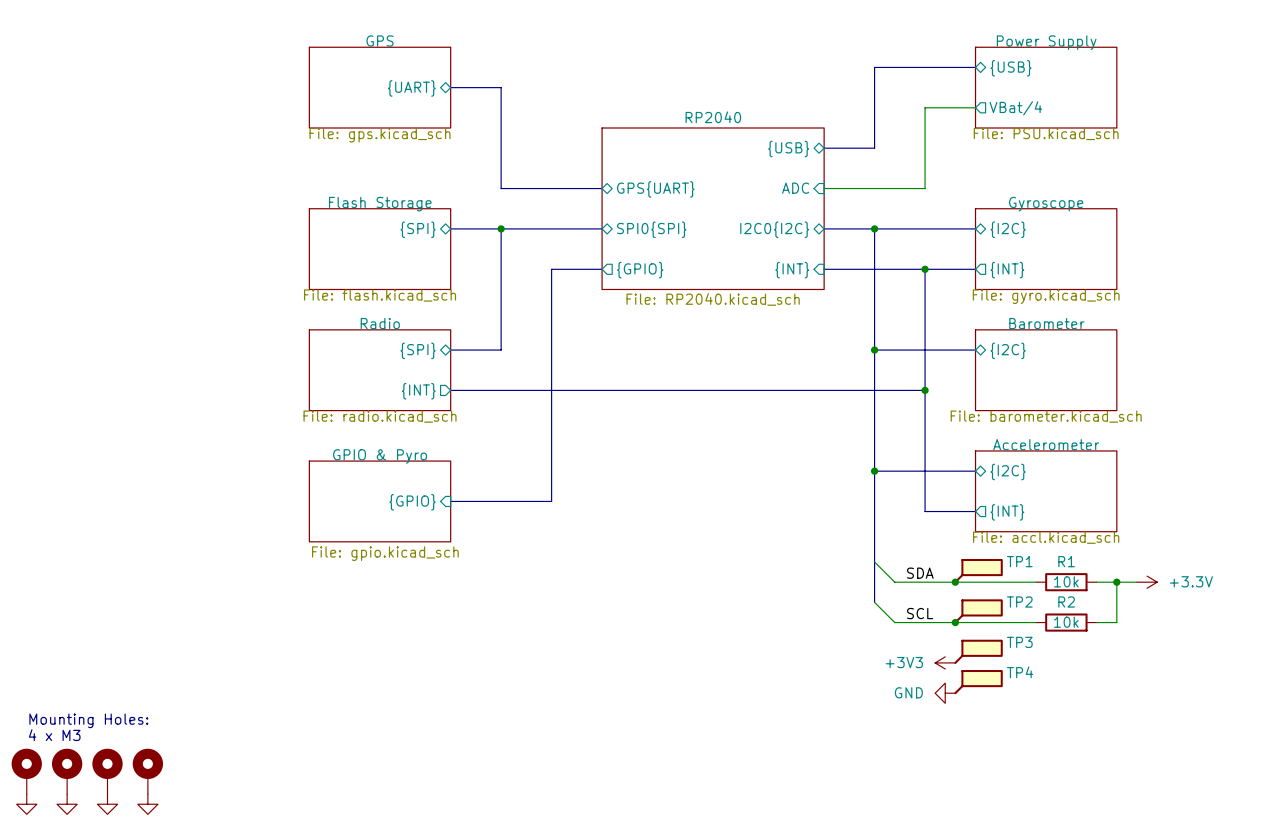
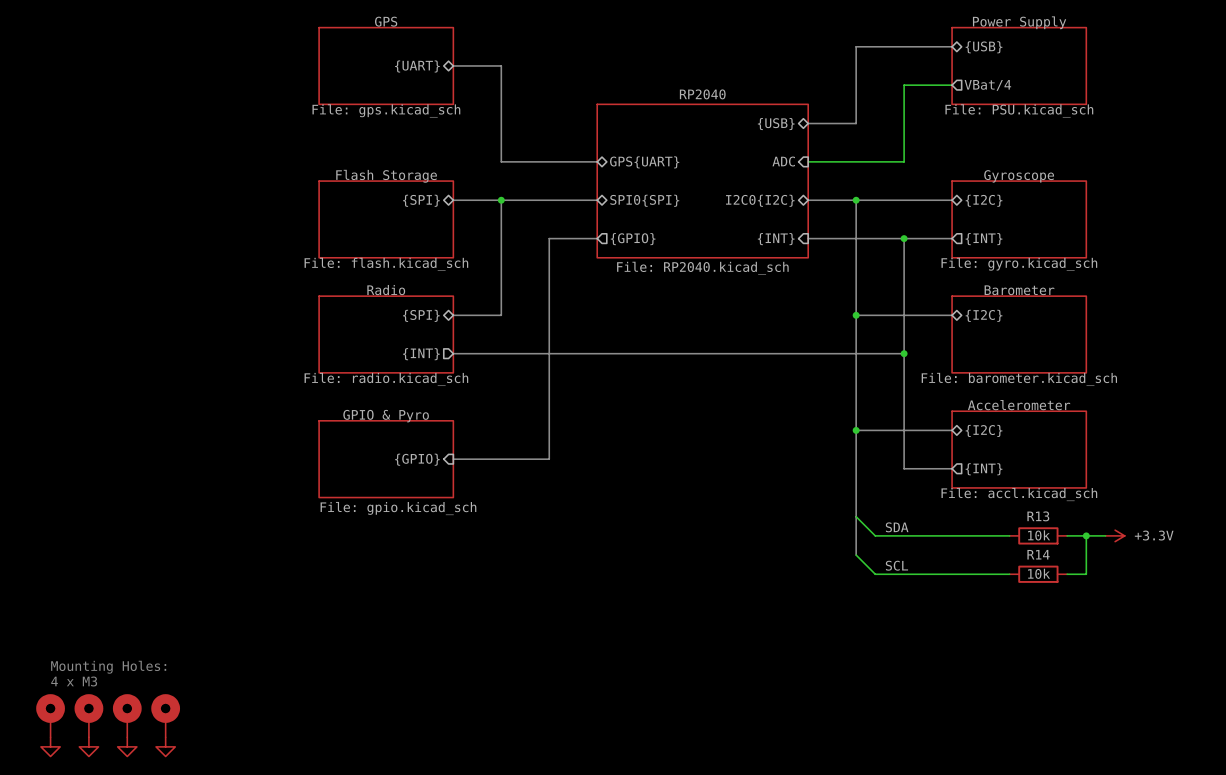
R1 name: R1 (1066, 561) -> R13 (1038, 516)
TP1: (978, 571) -> none
junction: (955, 582) -> none
R2 name: R2 (1066, 601) -> R14 (1038, 554)
TP2: (978, 611) -> none
junction: (955, 622) -> none
TP3: (978, 651) -> none
power symbol: +3V3 (945, 662) -> none
TP4: (978, 682) -> none
power symbol: GND (945, 693) -> none

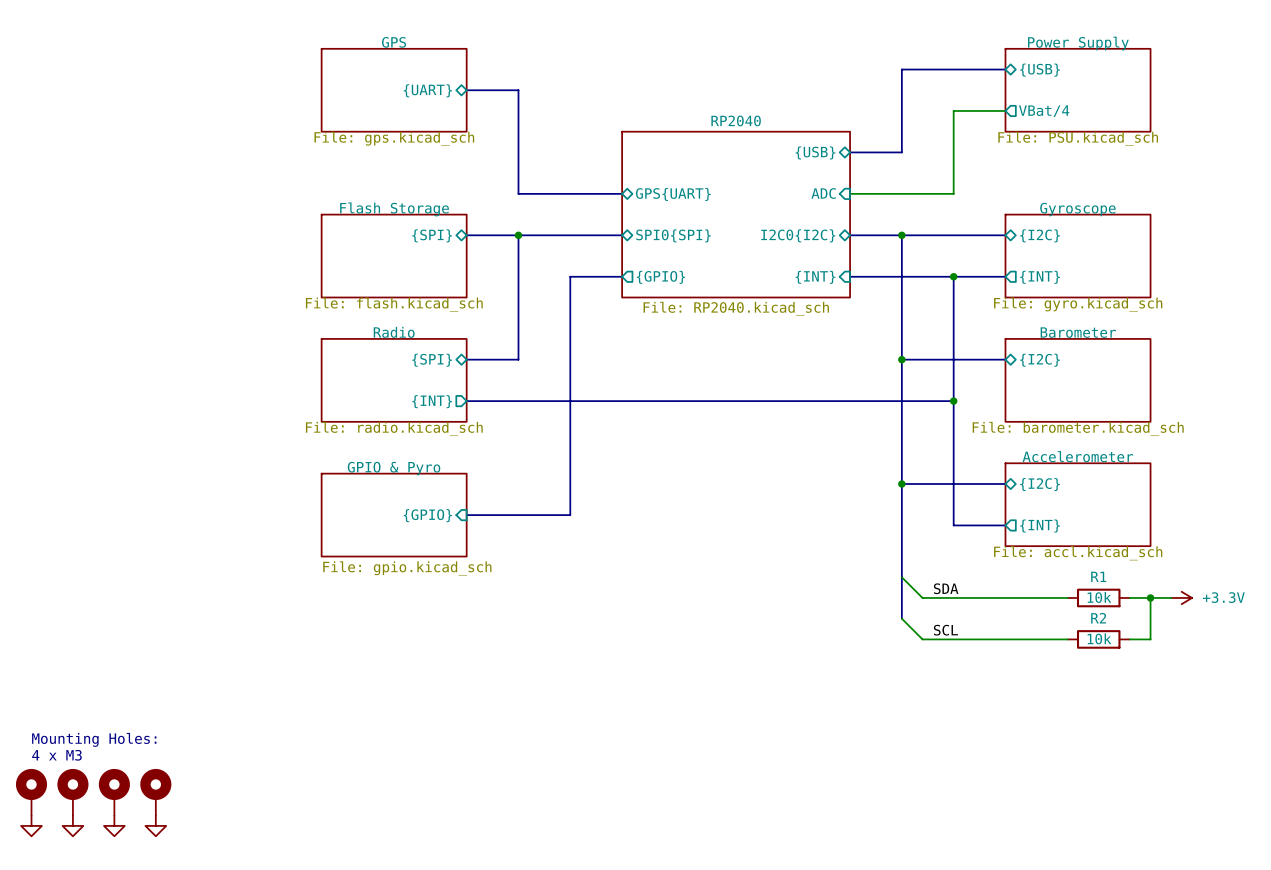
R13 name: R13 (1038, 516) -> R1 (1098, 576)
R14 name: R14 (1038, 554) -> R2 (1098, 618)

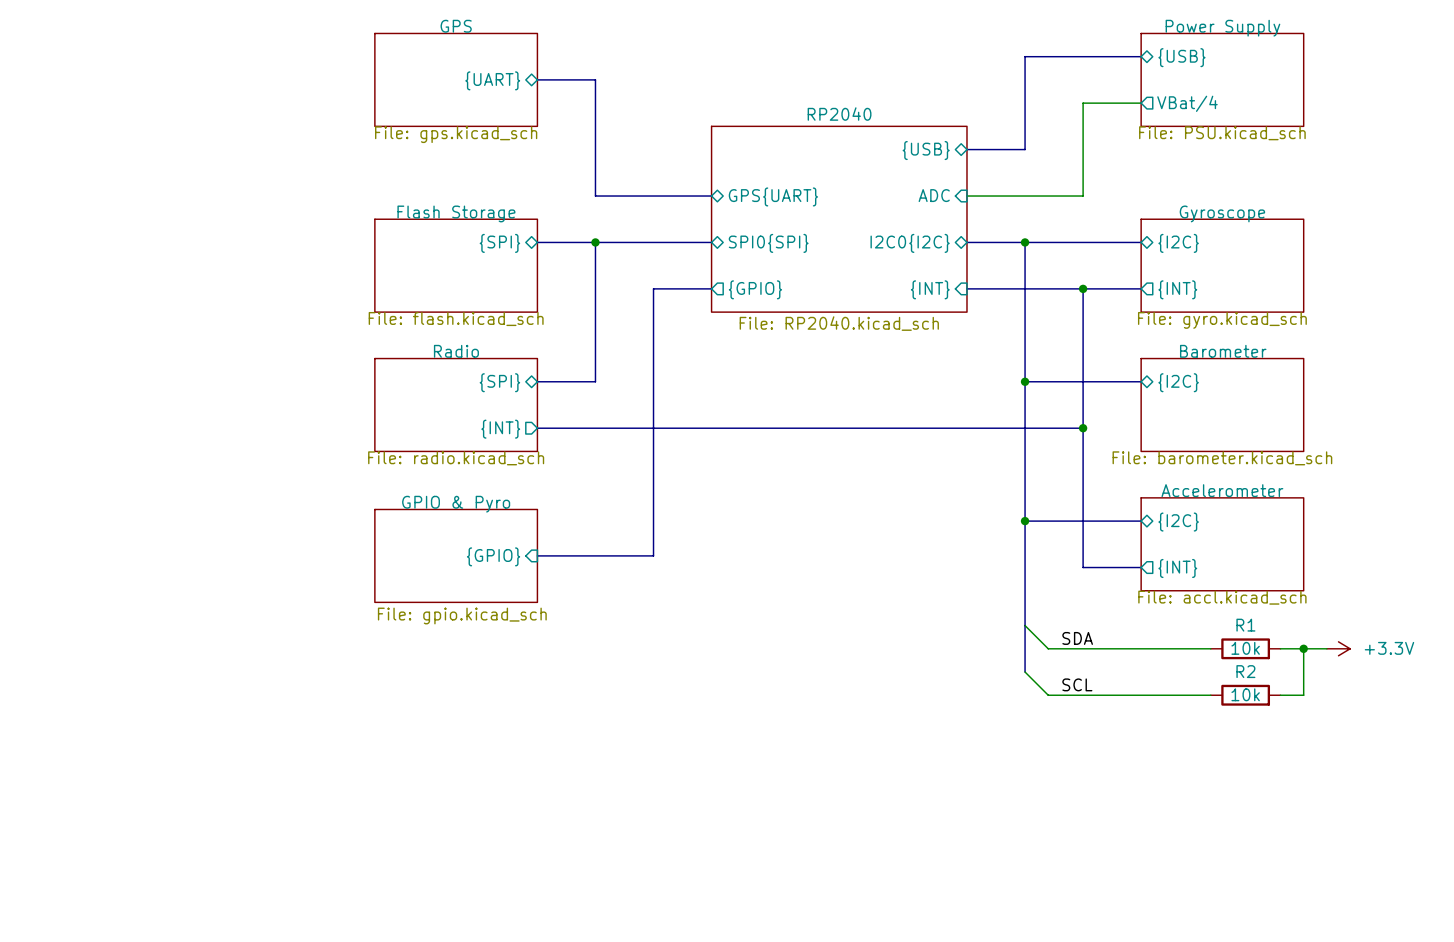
text: Mounting Holes: (94, 739) -> none
text: 4 x M3 (56, 755) -> none
part: (31, 792) -> none
part: (72, 792) -> none
part: (114, 792) -> none
part: (155, 792) -> none
power symbol: (31, 825) -> none
power symbol: (72, 825) -> none
power symbol: (114, 825) -> none
power symbol: (155, 825) -> none

